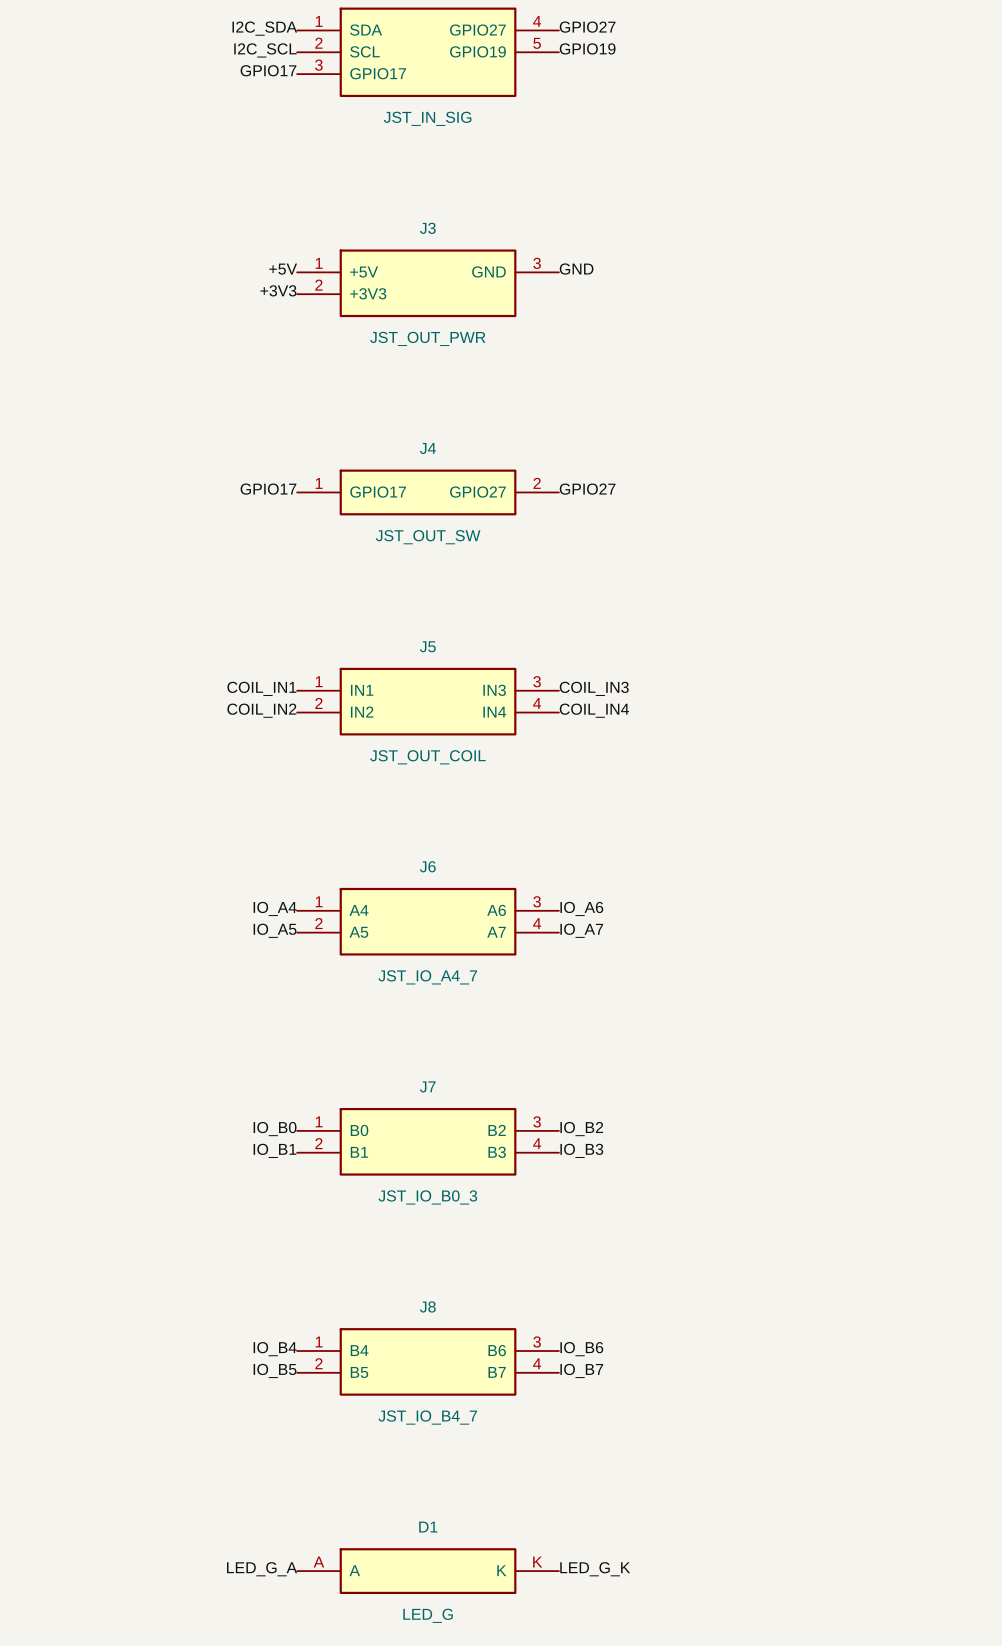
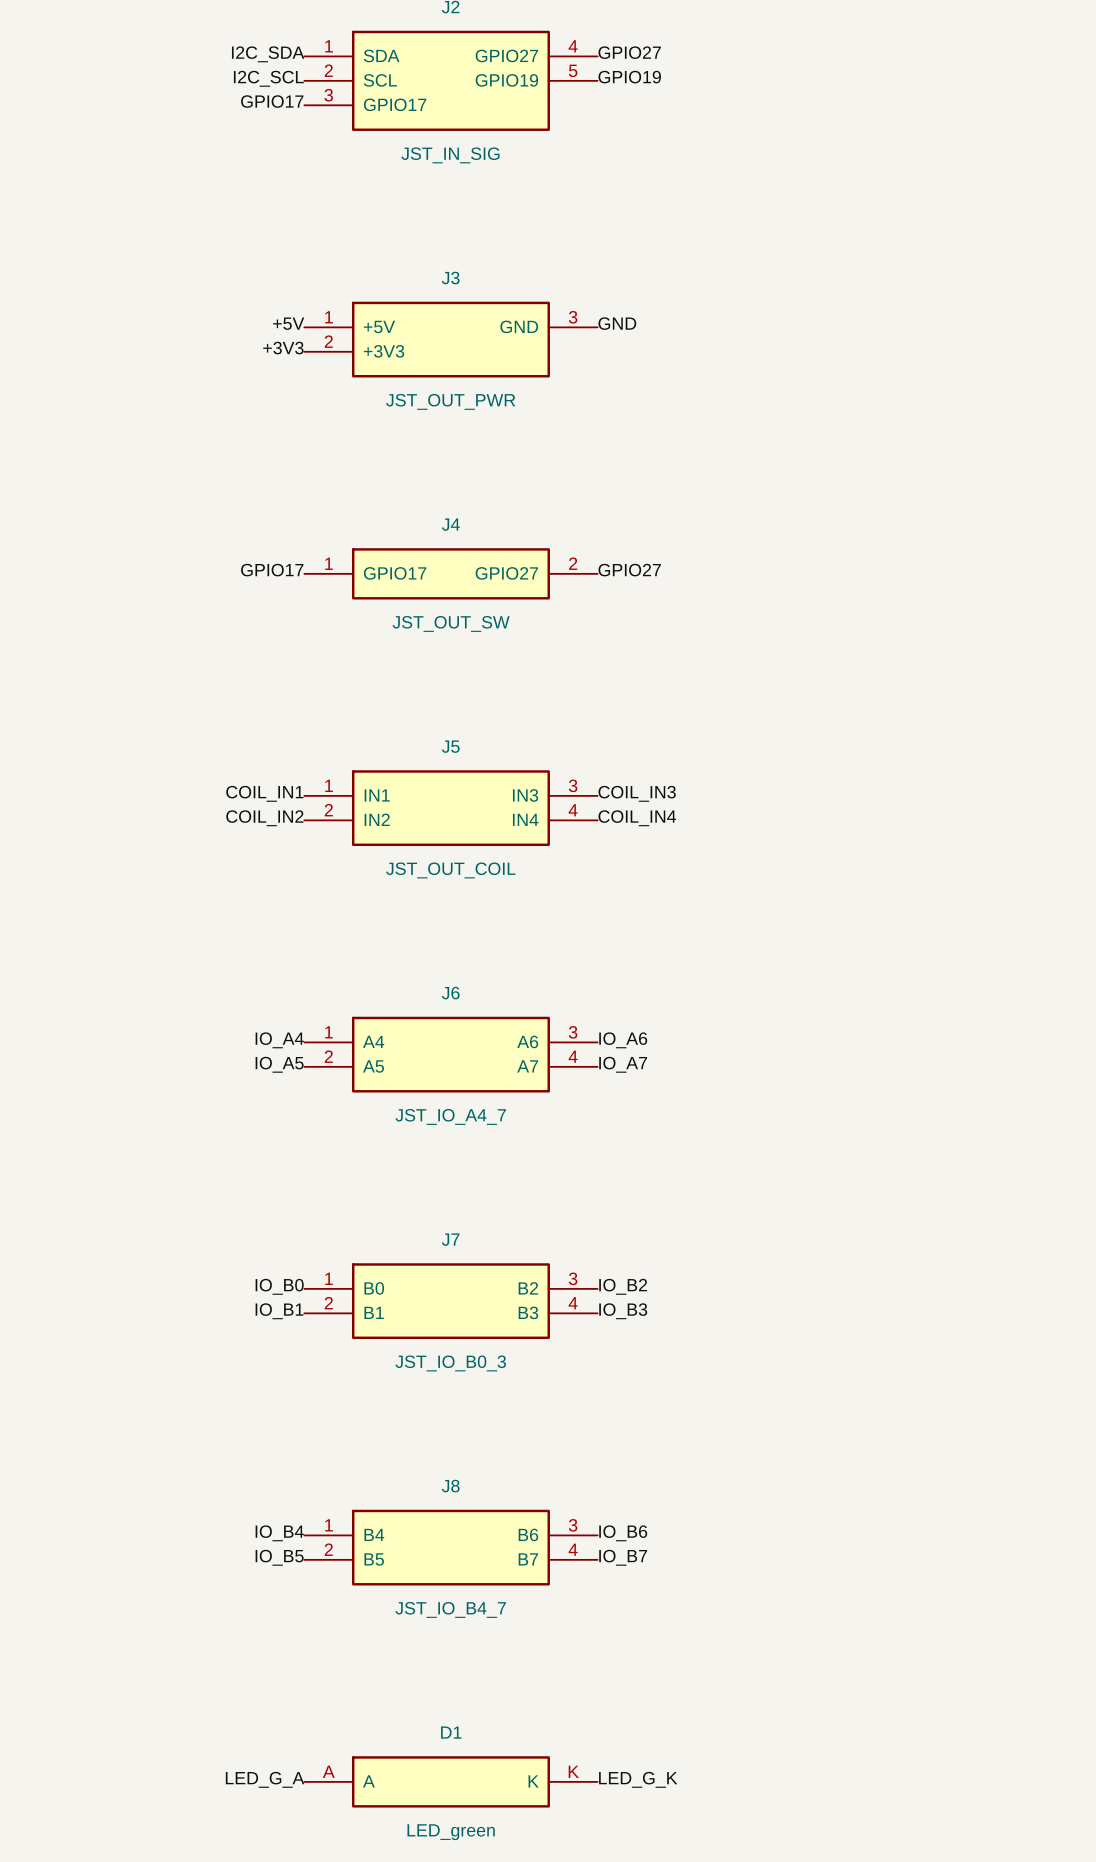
D1 value: LED_G (428, 1615) -> LED_green (451, 1832)

